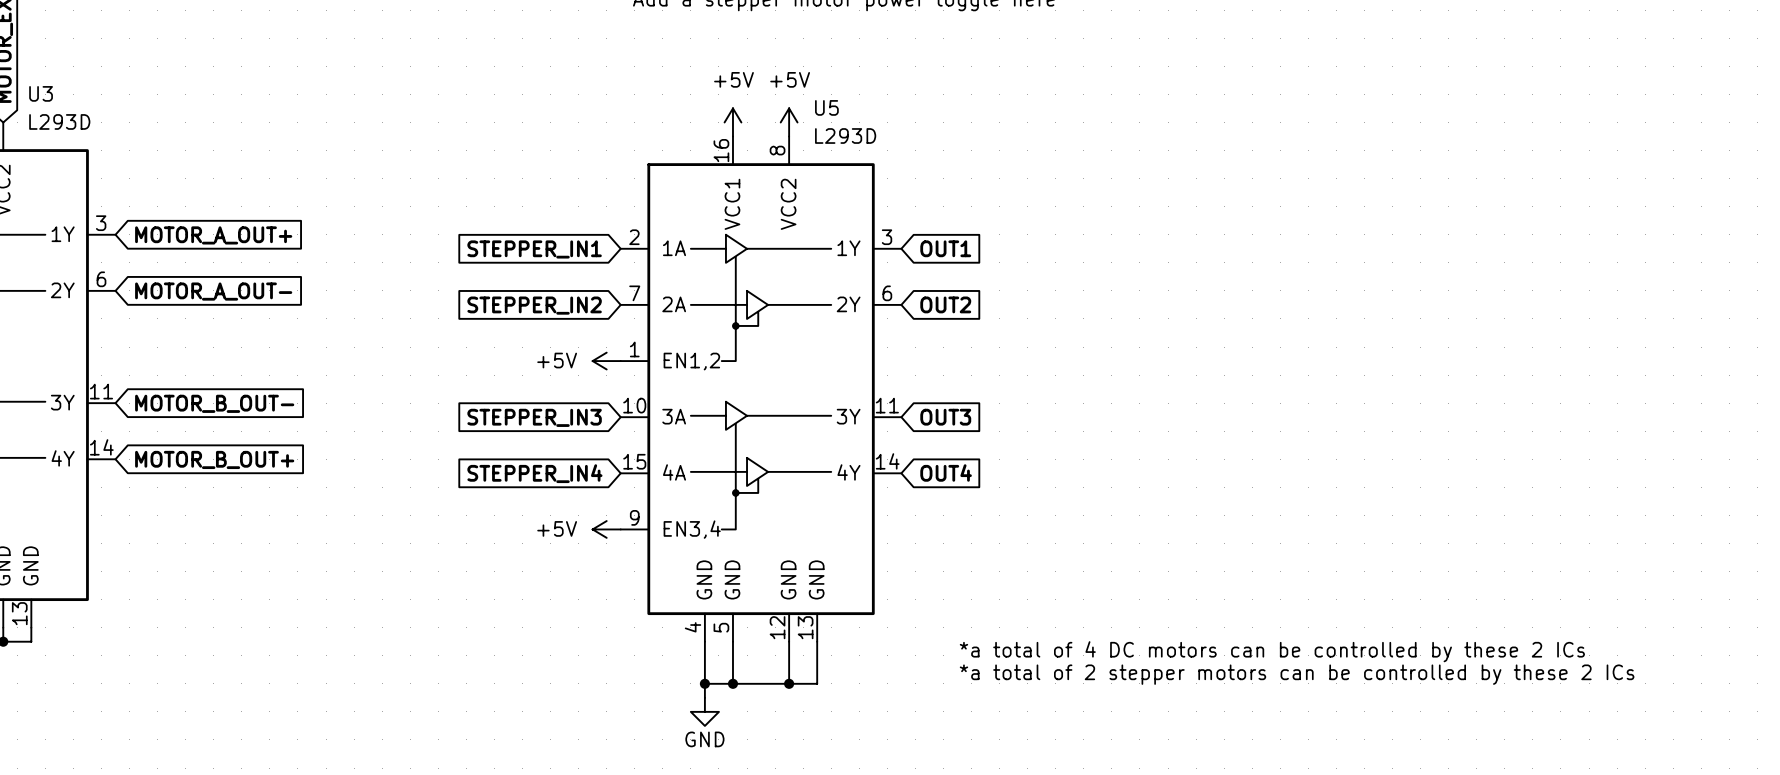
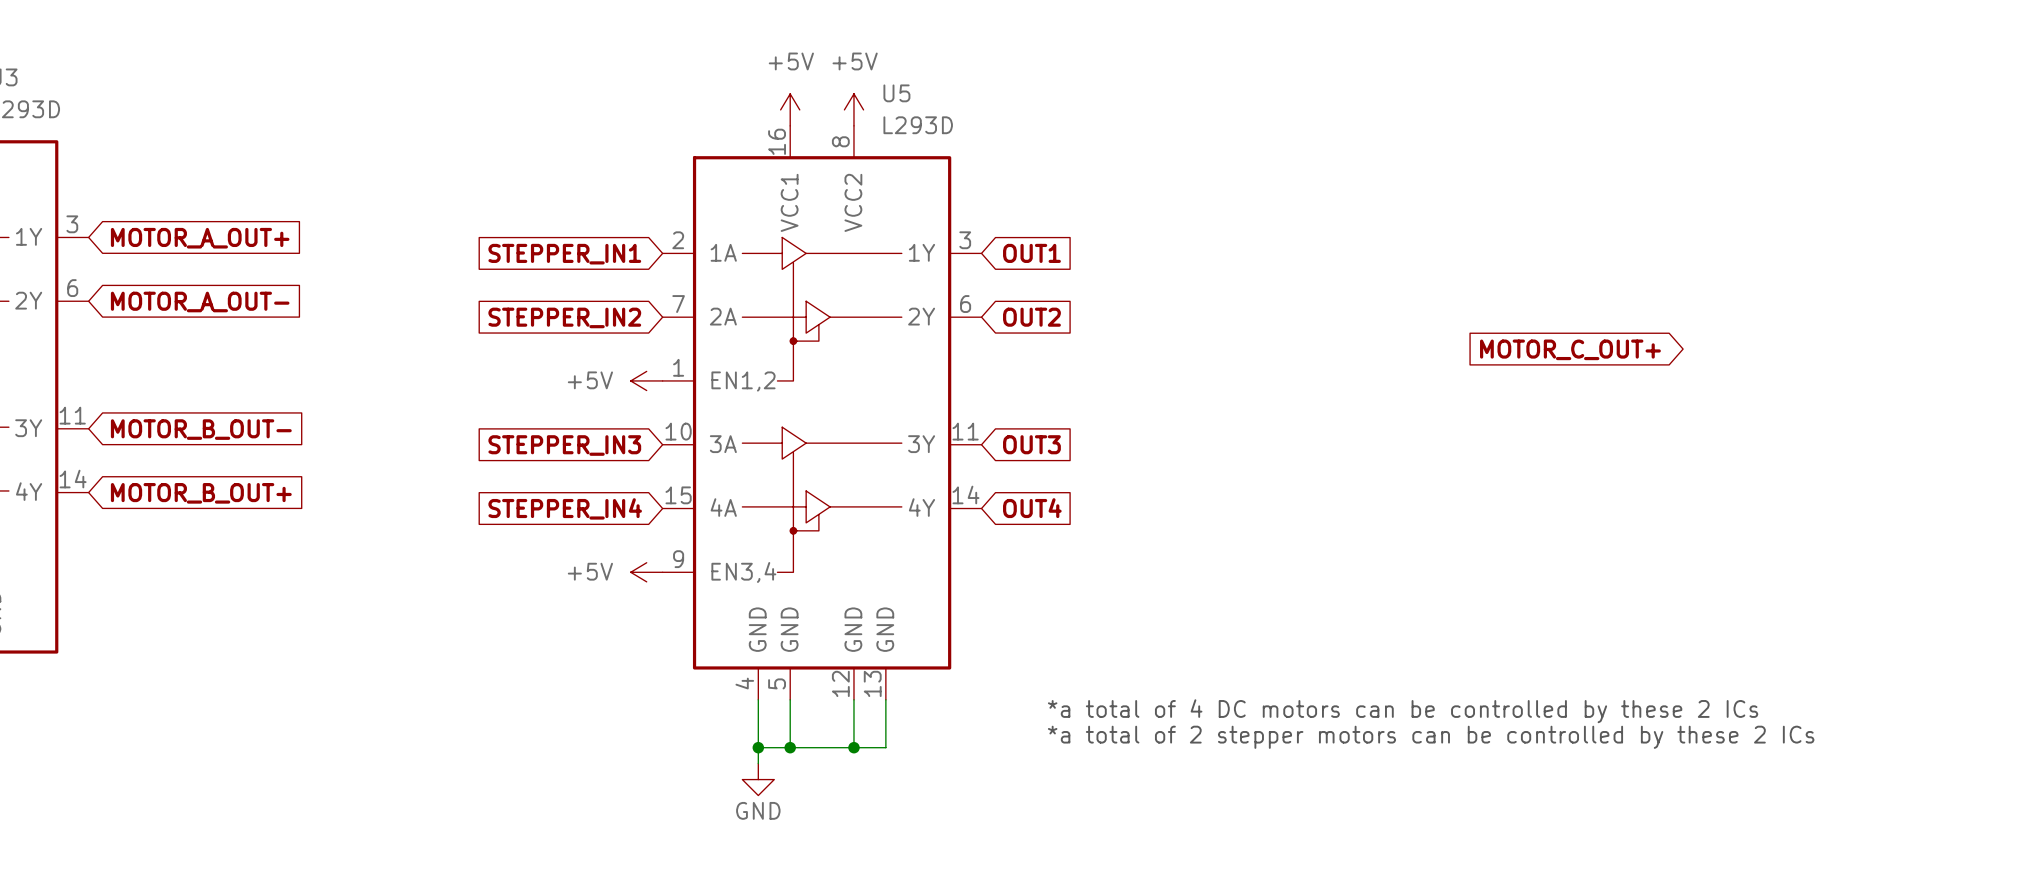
global label: none -> MOTOR_C_OUT+ (1570, 349)

